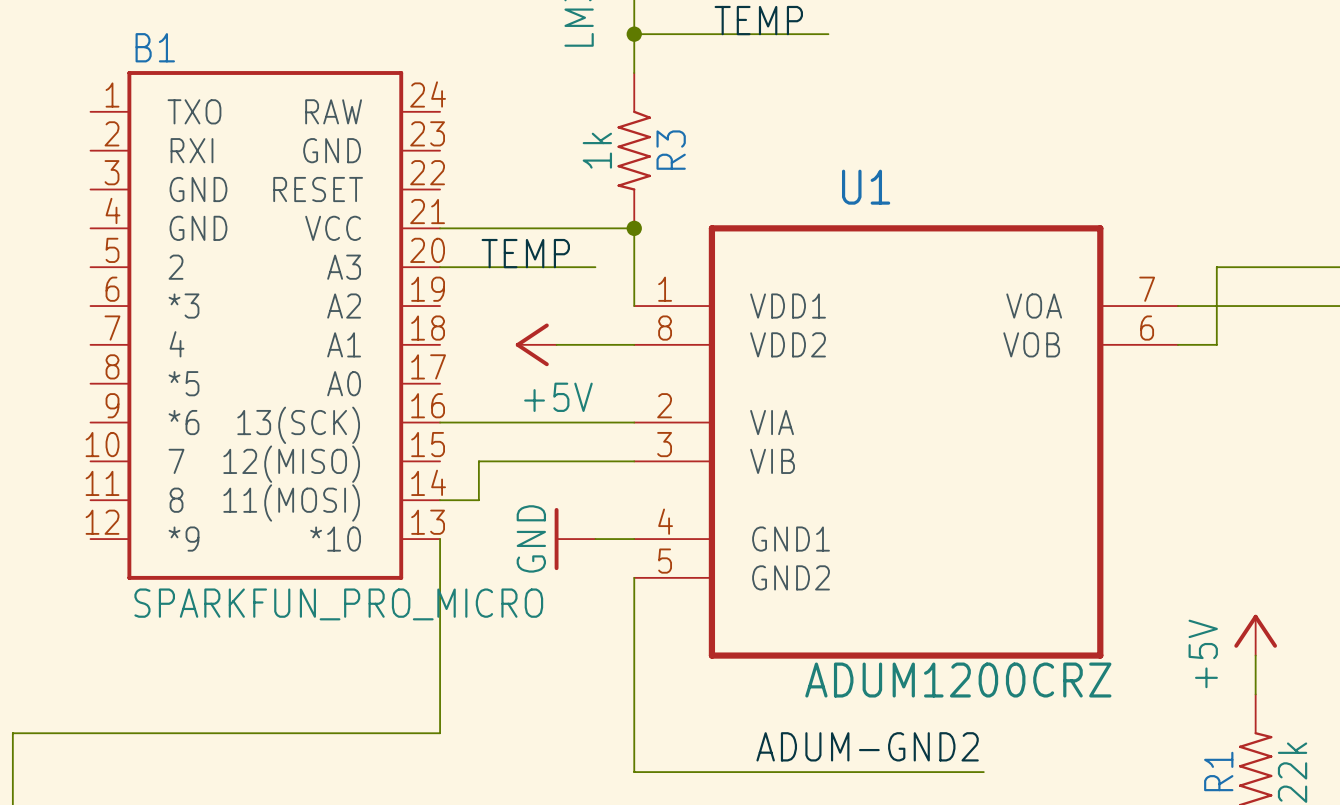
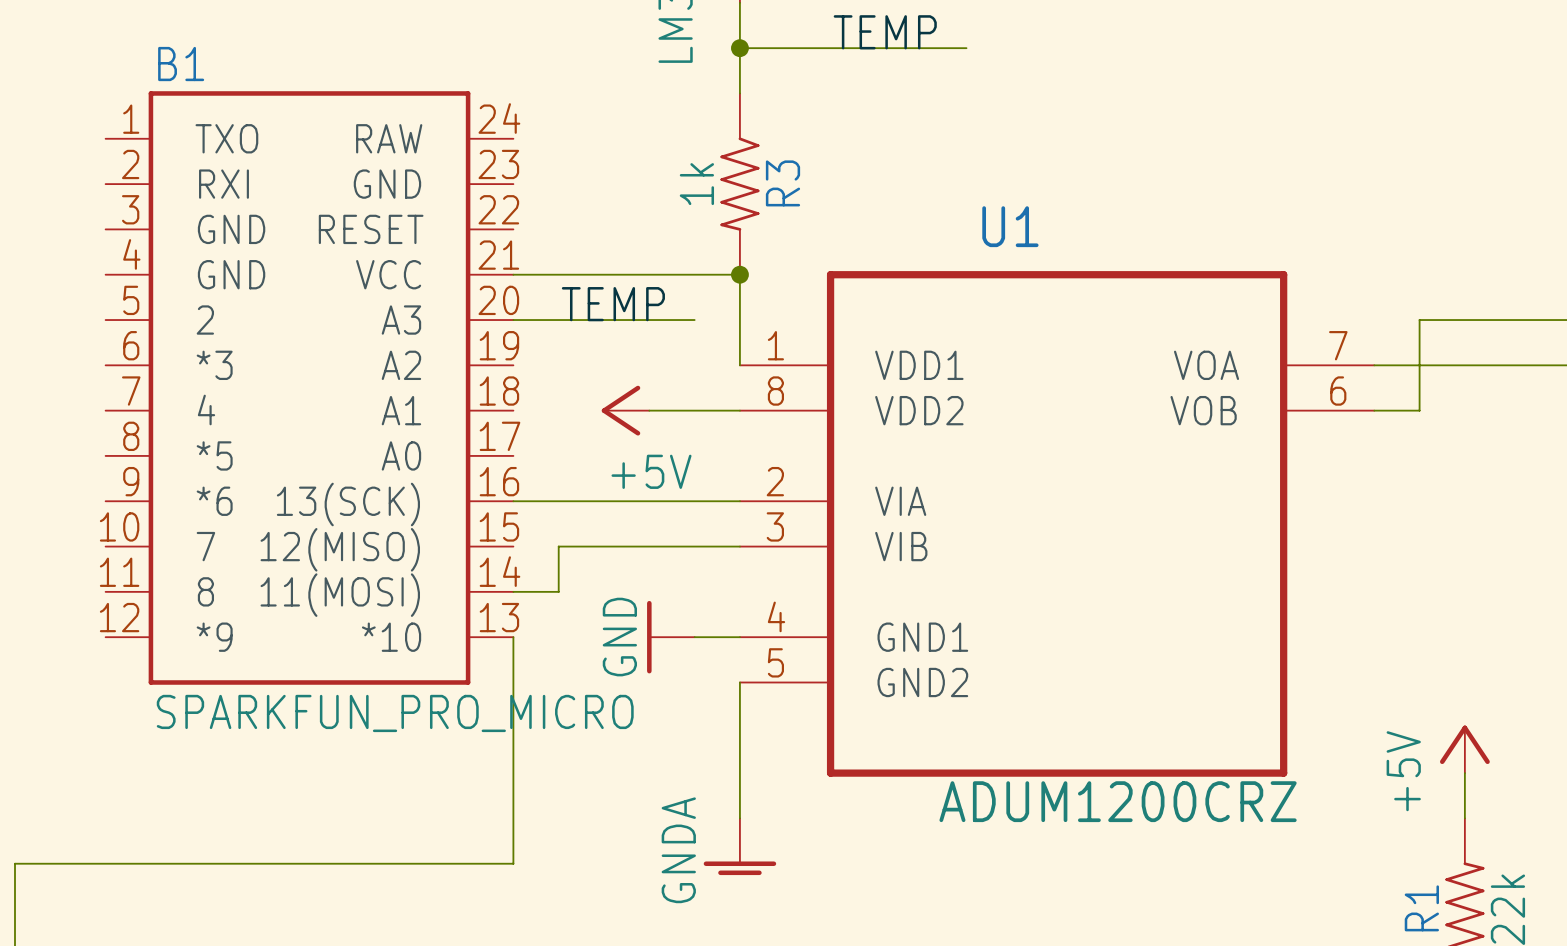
wire: (634, 694) (634, 772) (983, 772) -> none
power symbol: none -> GNDA (739, 846)
label: ADUM-GND2 (867, 746) -> none

